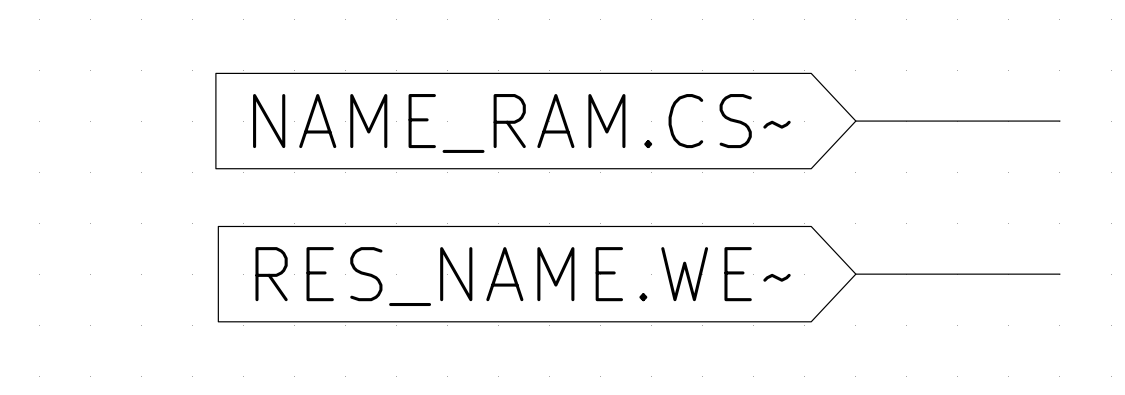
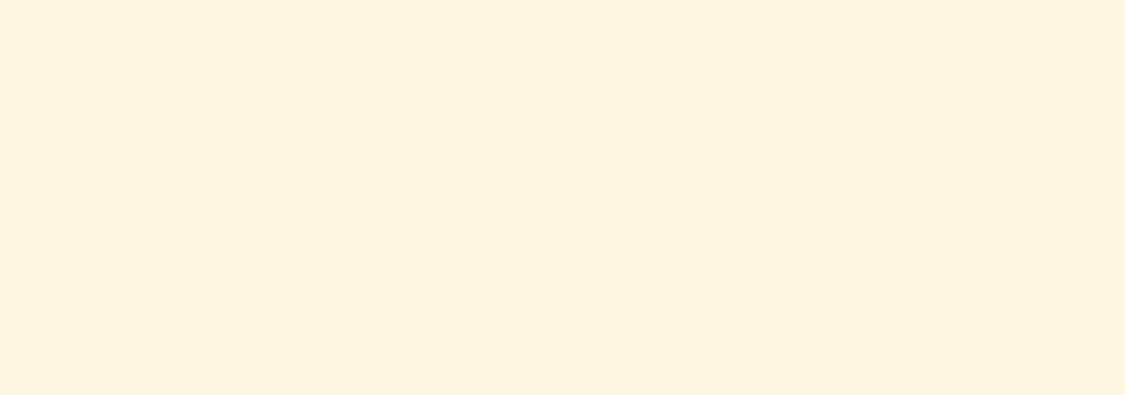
wire: (855, 121) (1059, 121) -> none
global label: NAME_RAM.CS~ (521, 123) -> none
wire: (855, 274) (1059, 274) -> none
global label: RES_NAME.WE~ (523, 276) -> none

